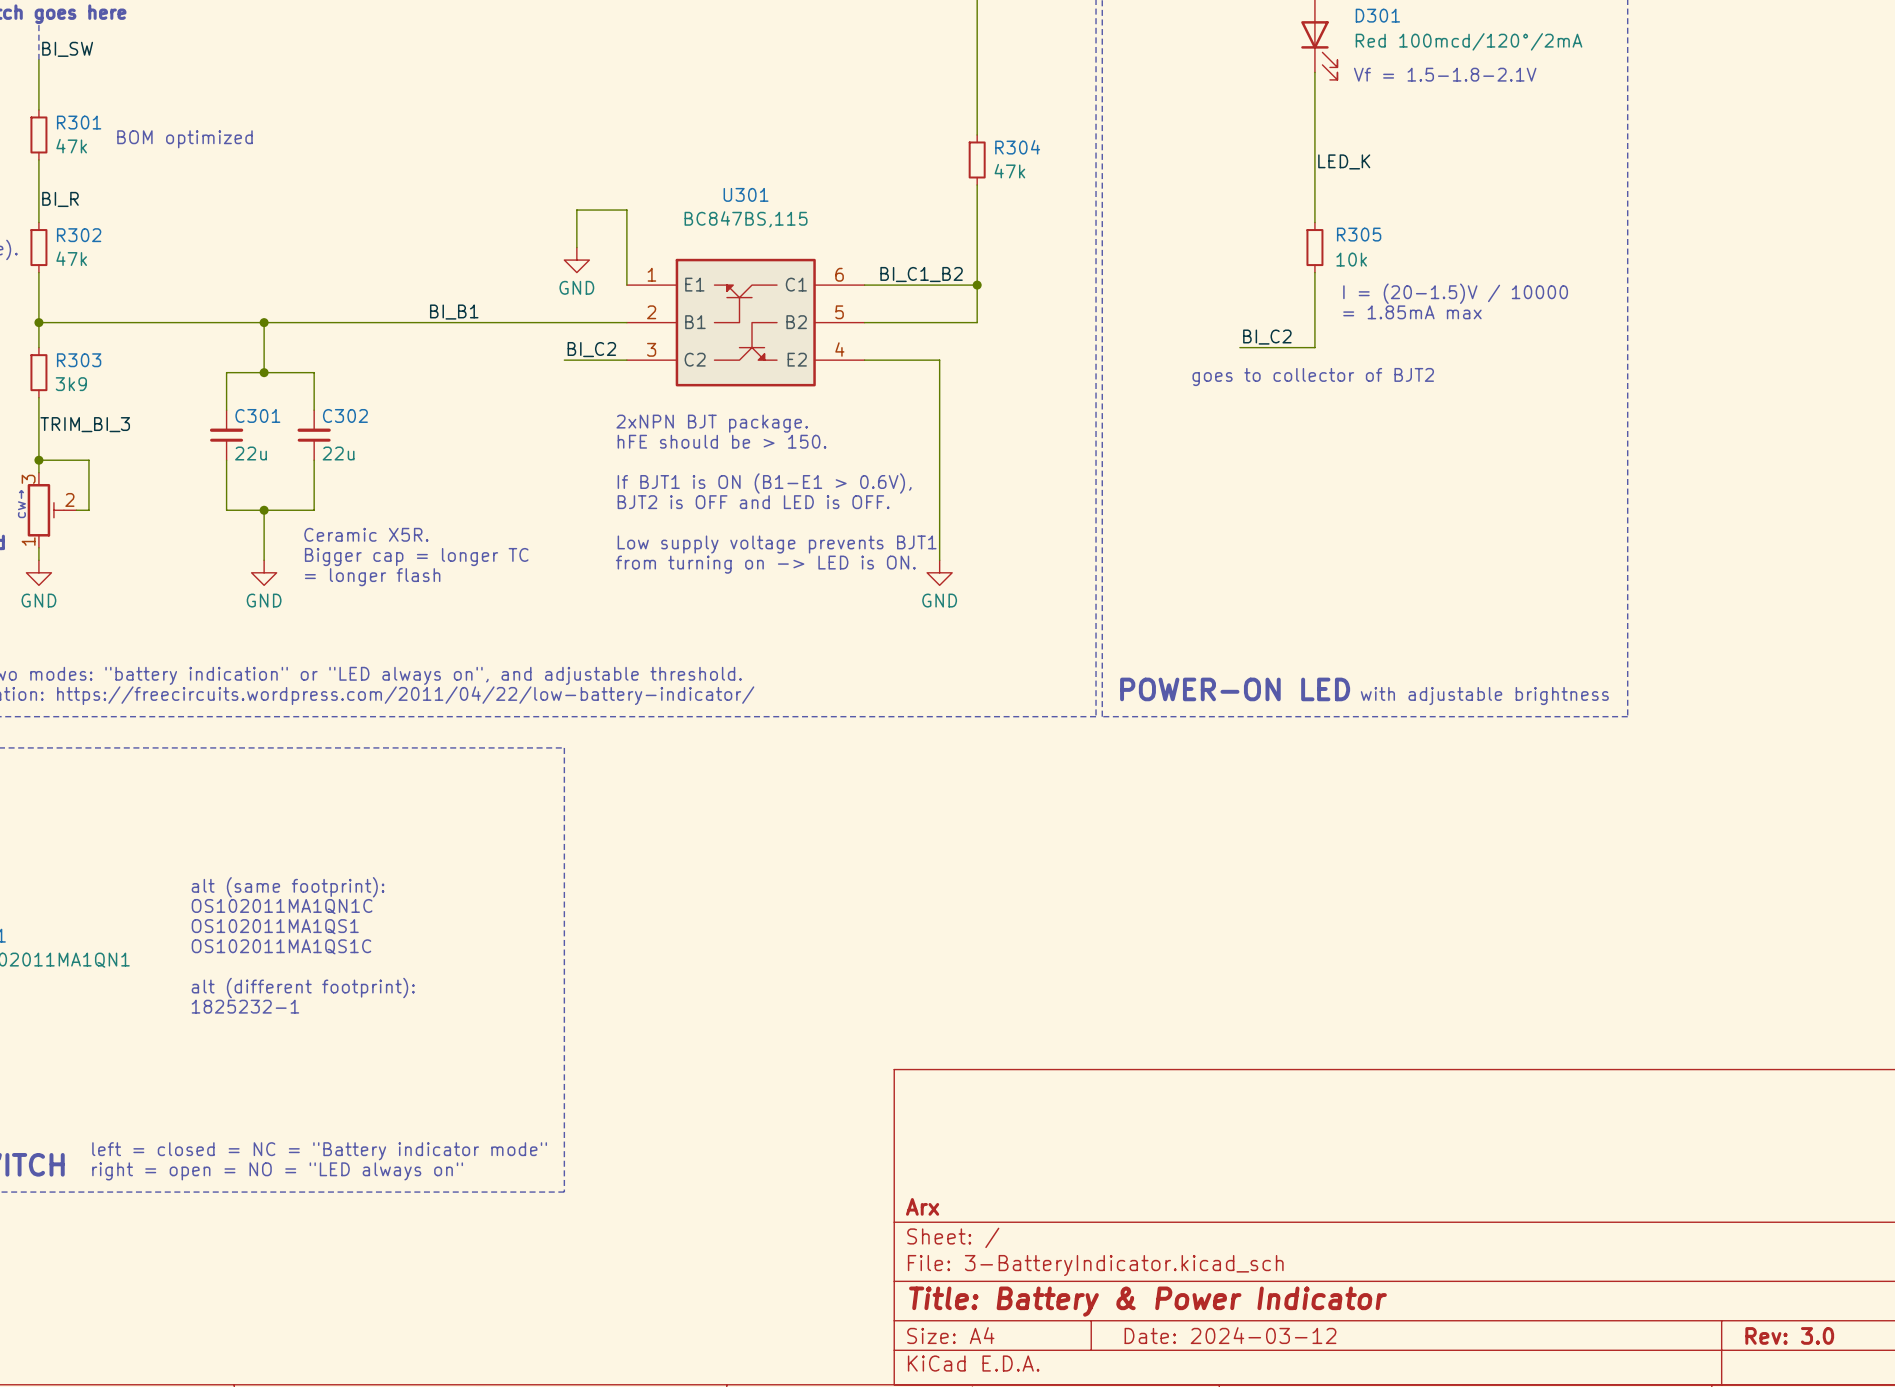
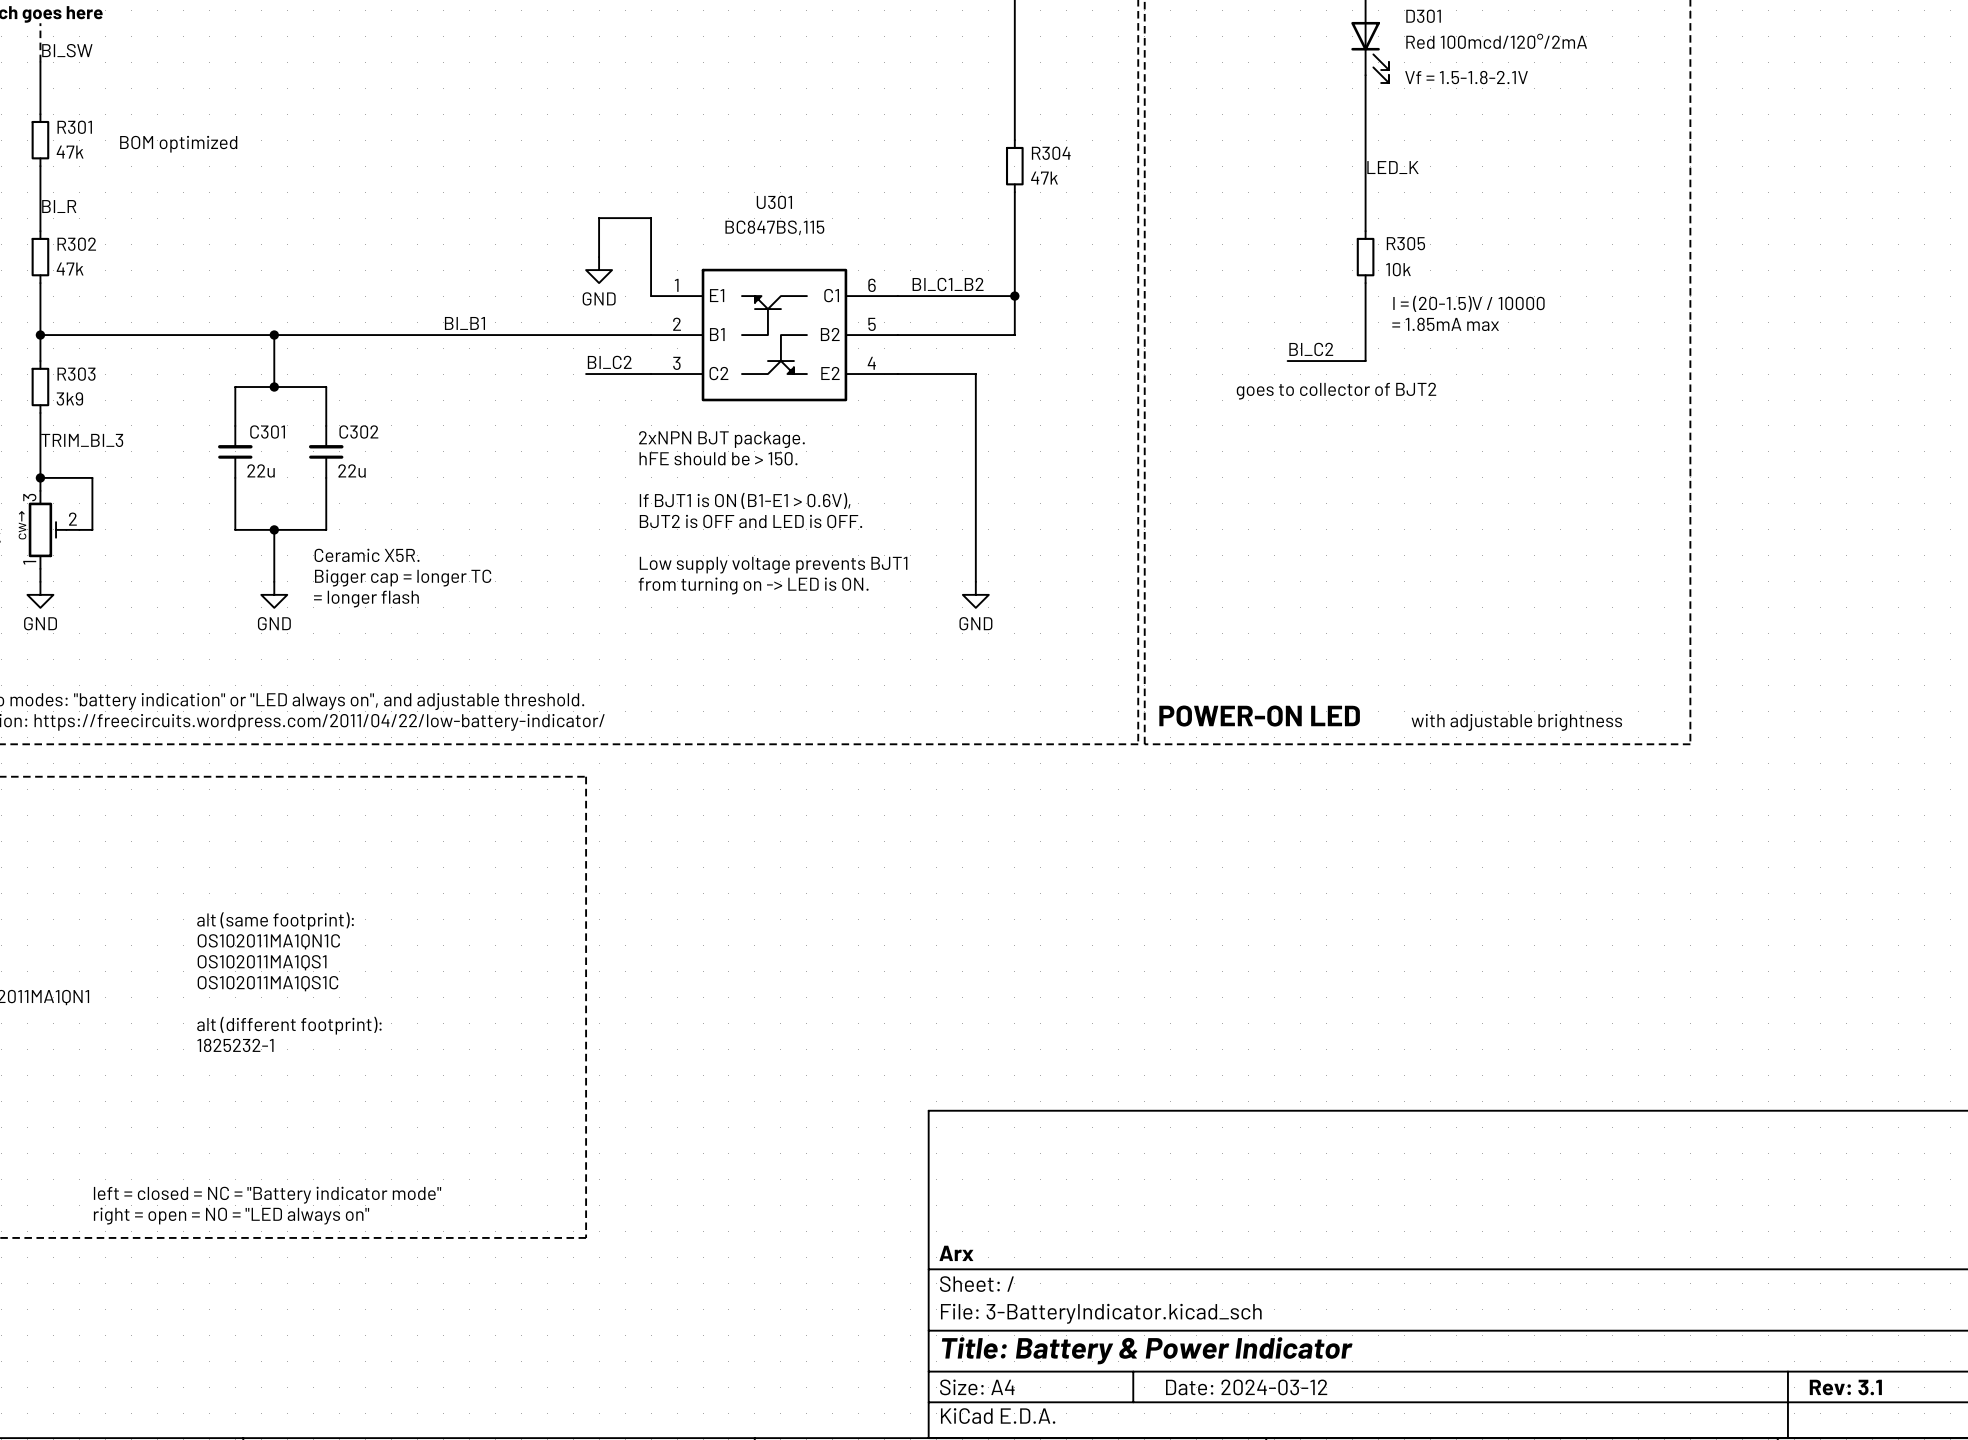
title block: Rev: 3.0 (1789, 1335) -> Rev: 3.1 (1845, 1387)

